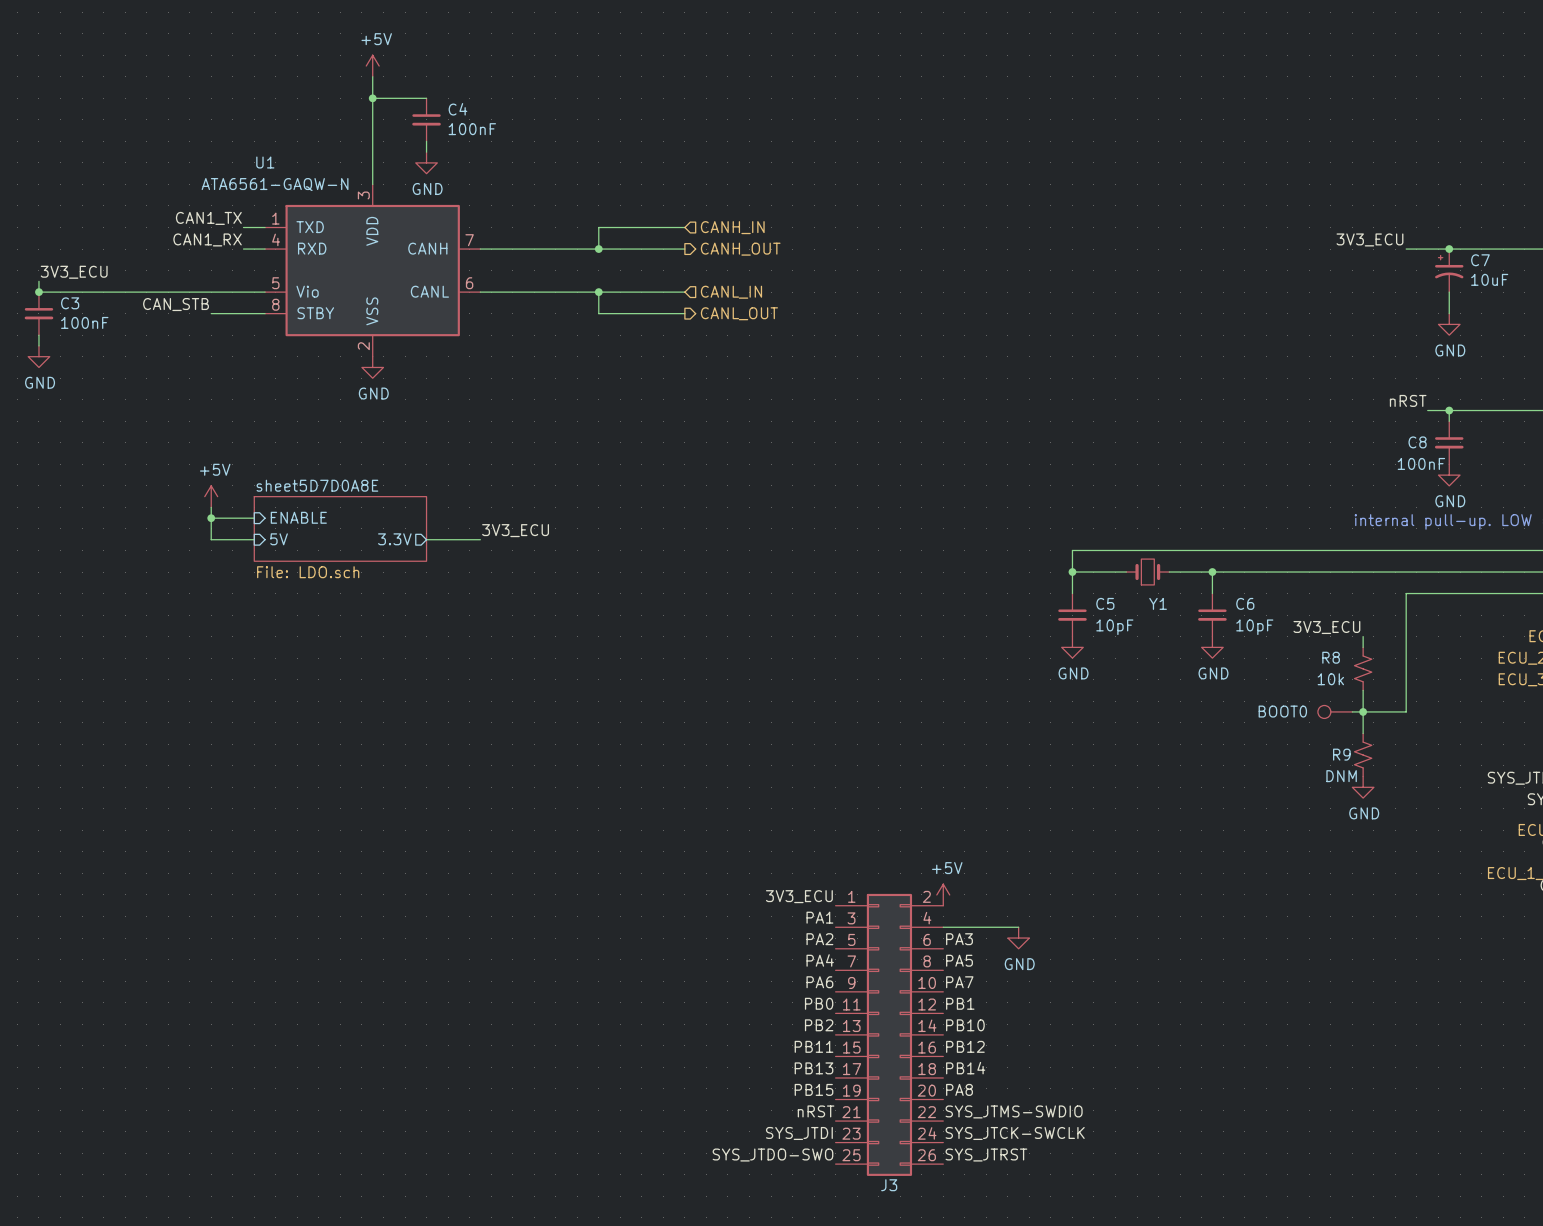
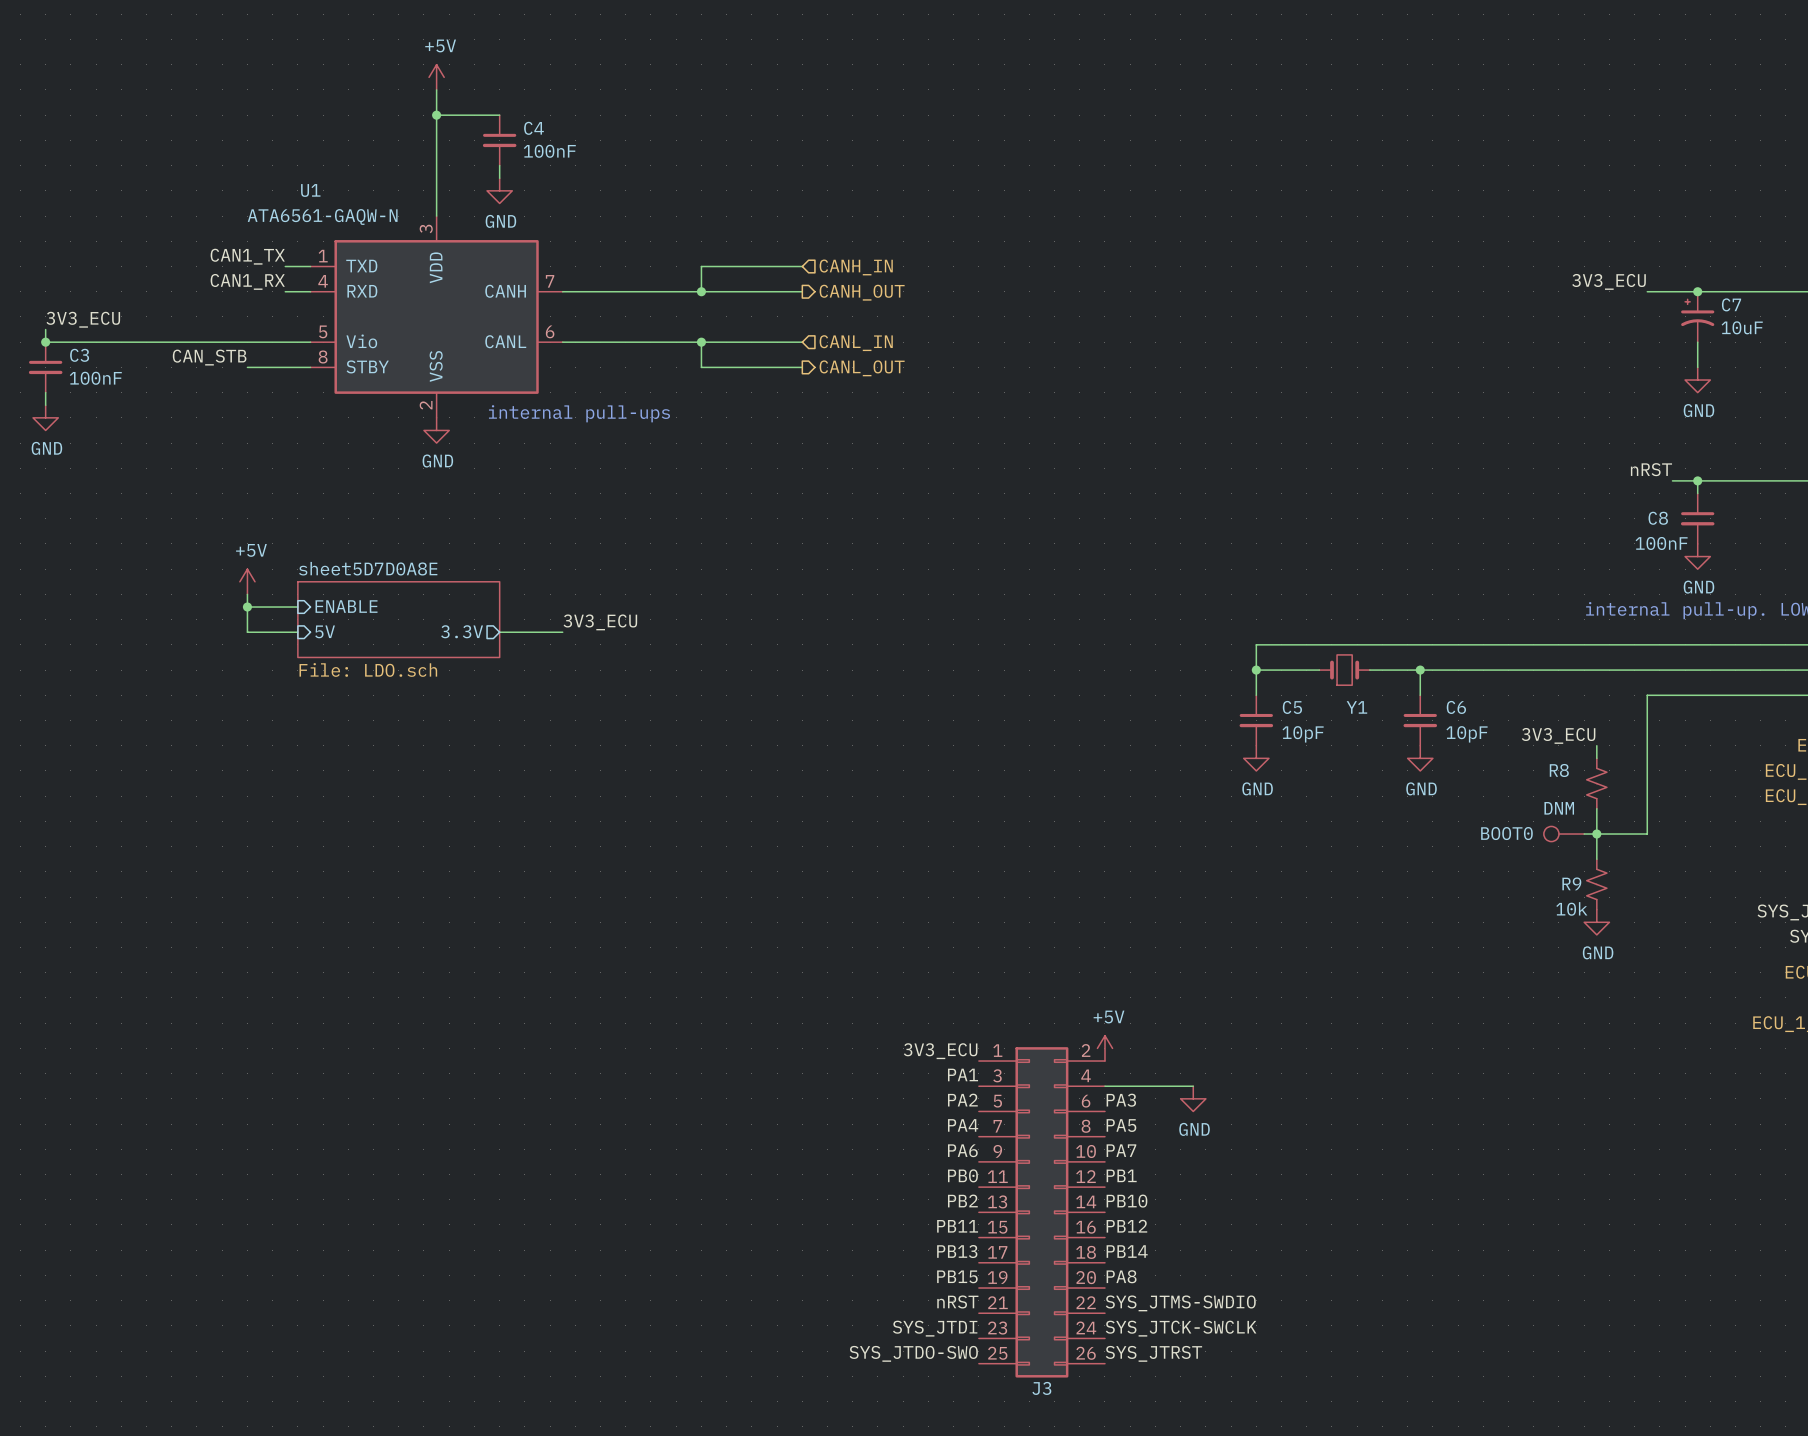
text: none -> internal pull-ups (579, 413)
R8 value: 10k (1330, 679) -> DNM (1559, 808)
R9 value: DNM (1341, 776) -> 10k (1571, 908)

